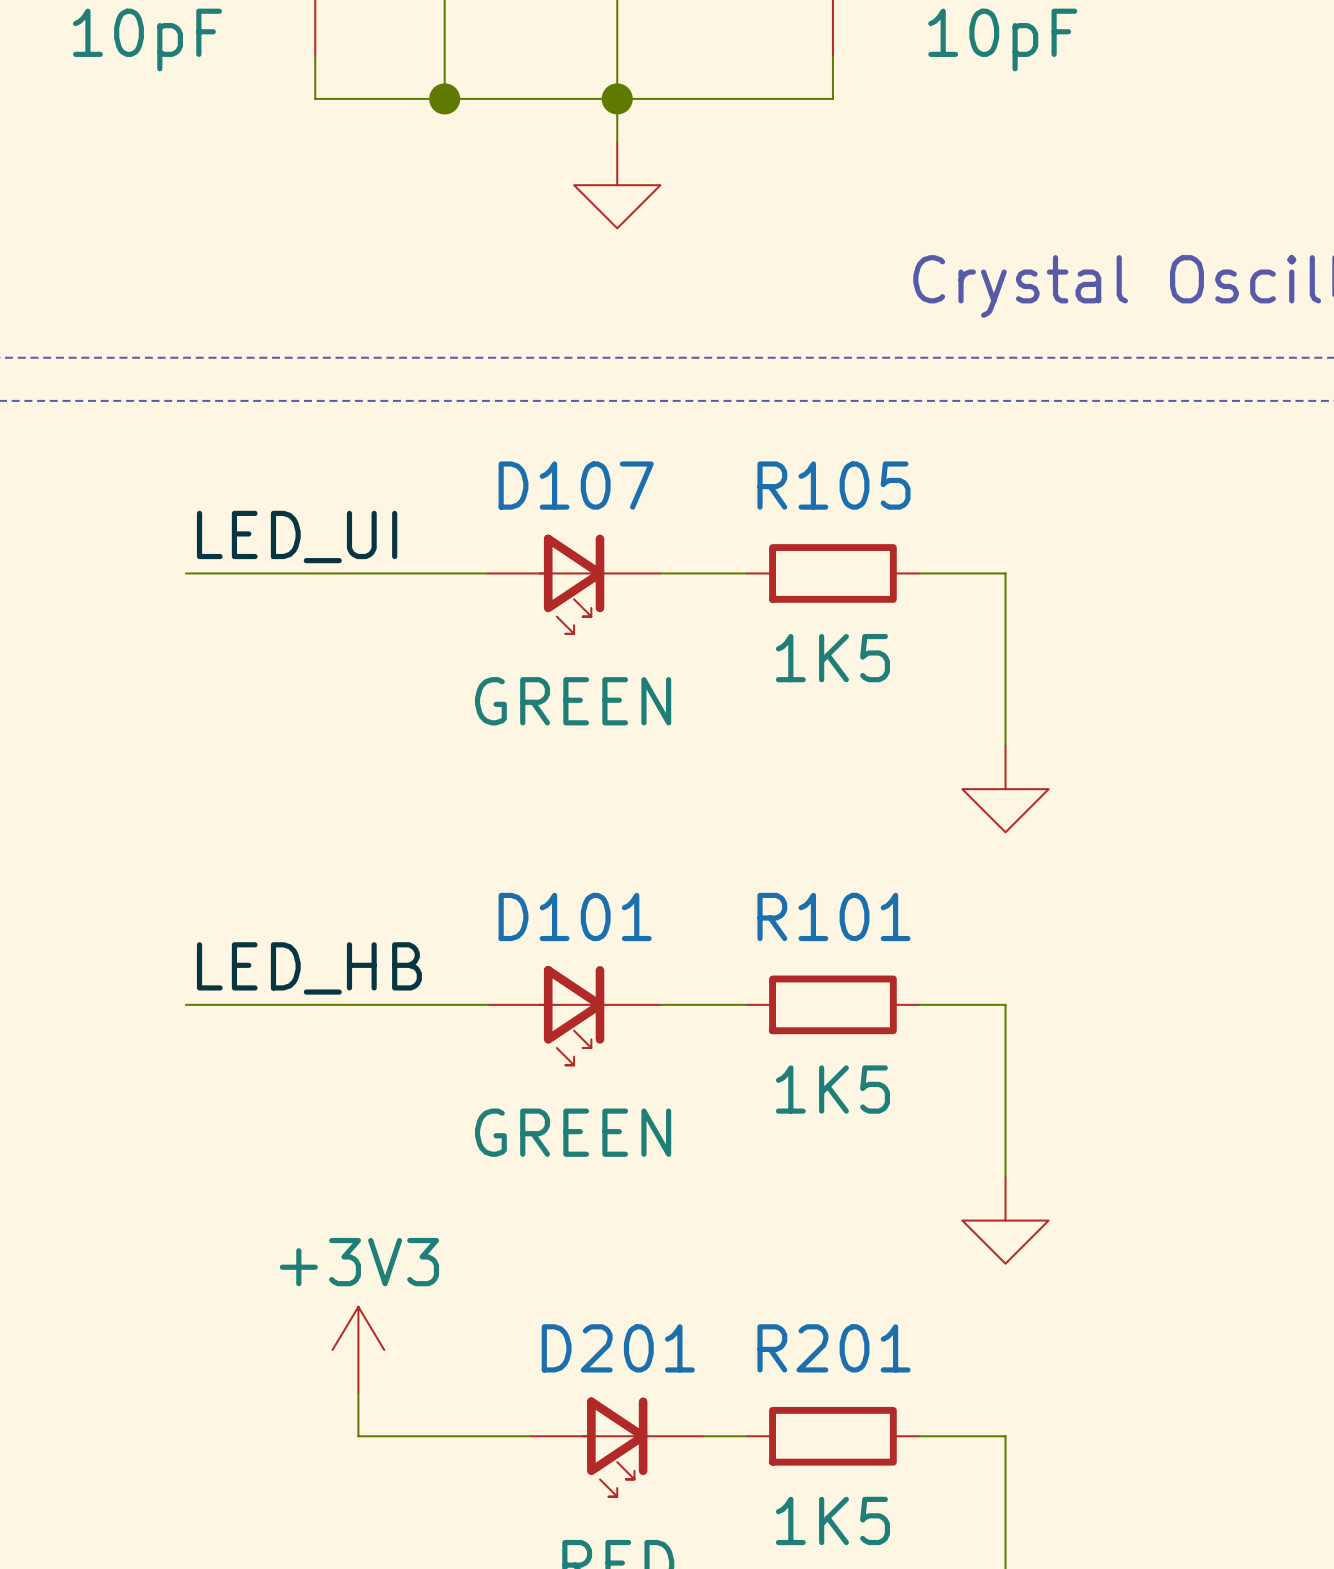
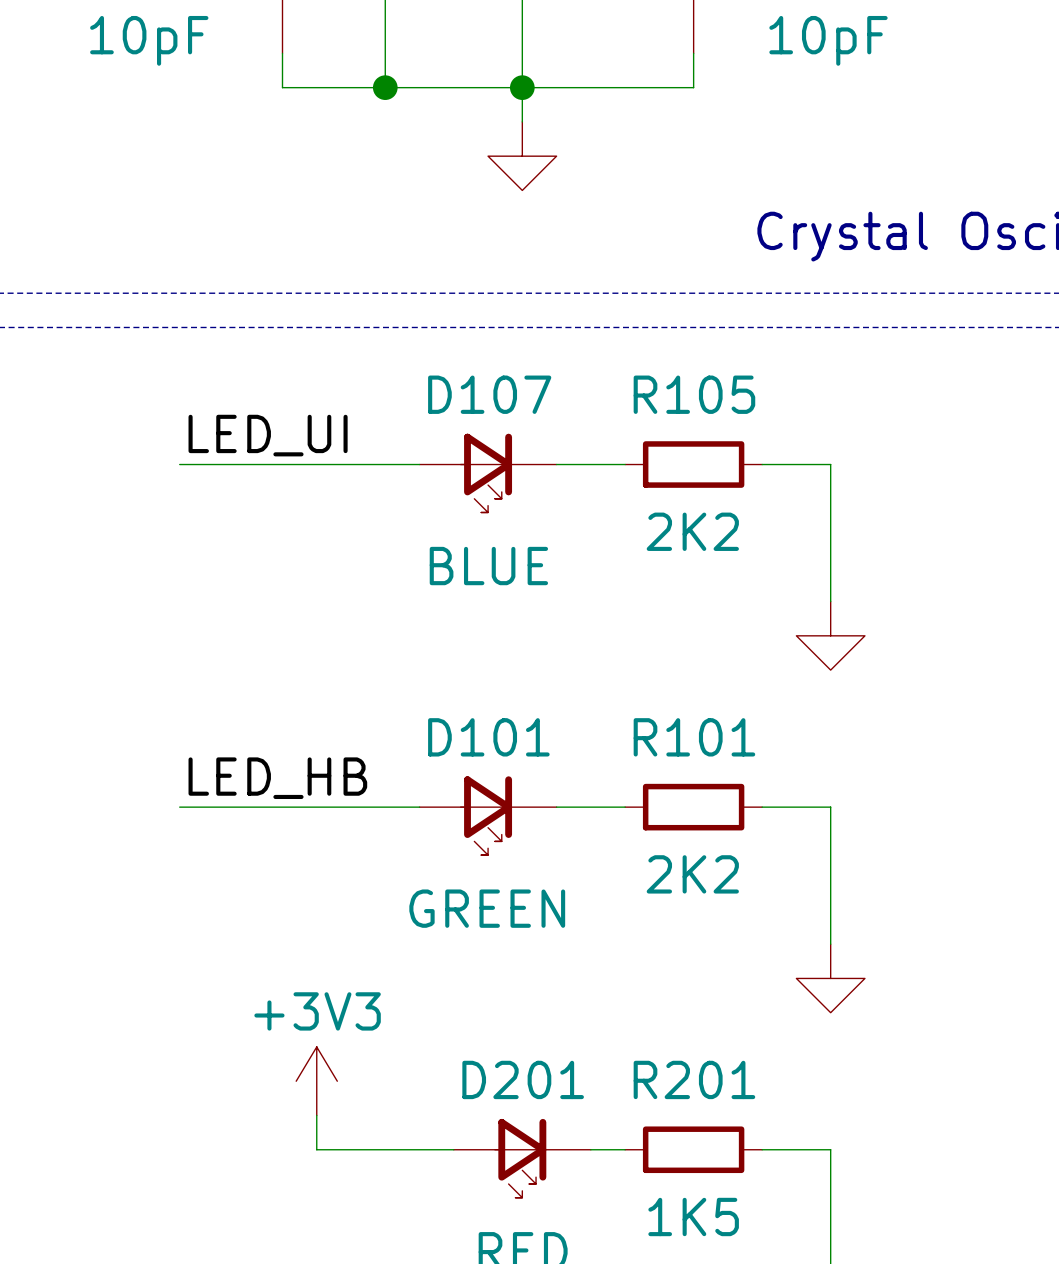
R105 value: 1K5 (832, 658) -> 2K2 (692, 531)
D107 value: GREEN (573, 701) -> BLUE (488, 566)
R101 value: 1K5 (832, 1089) -> 2K2 (692, 874)

